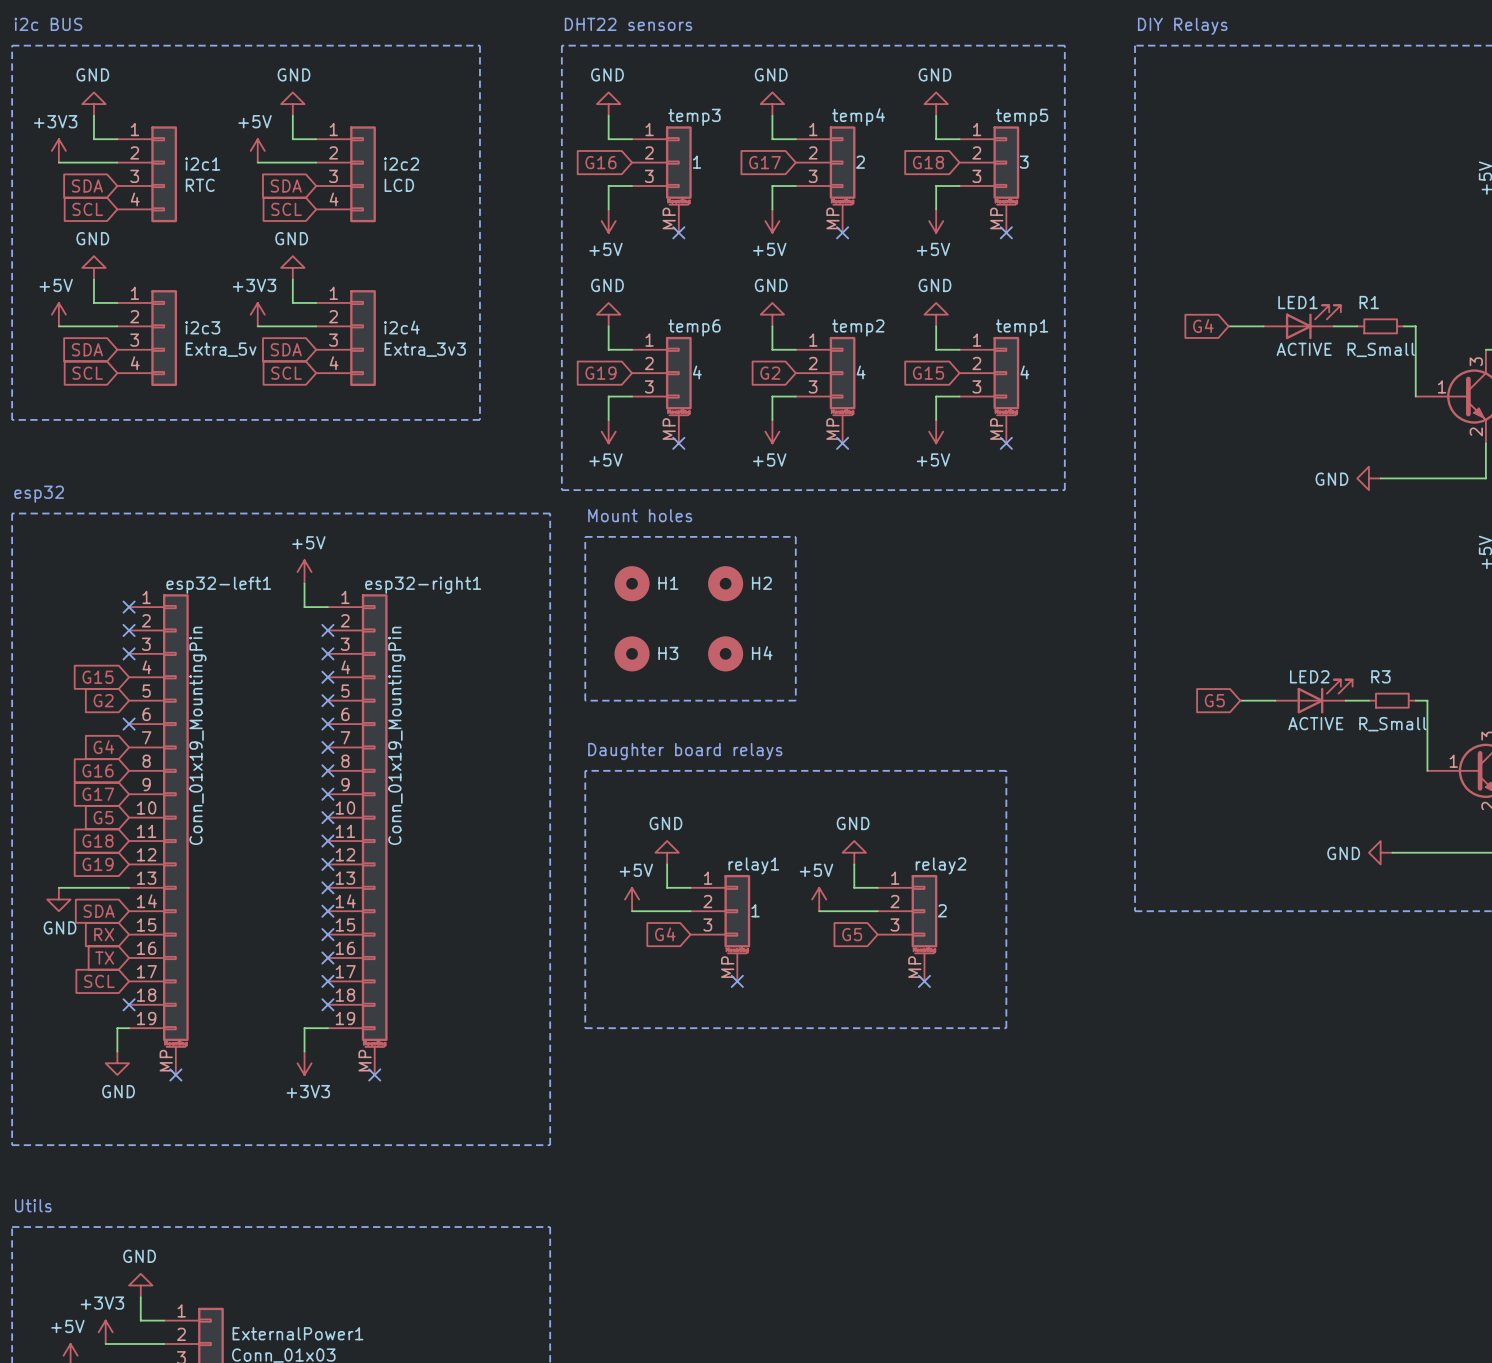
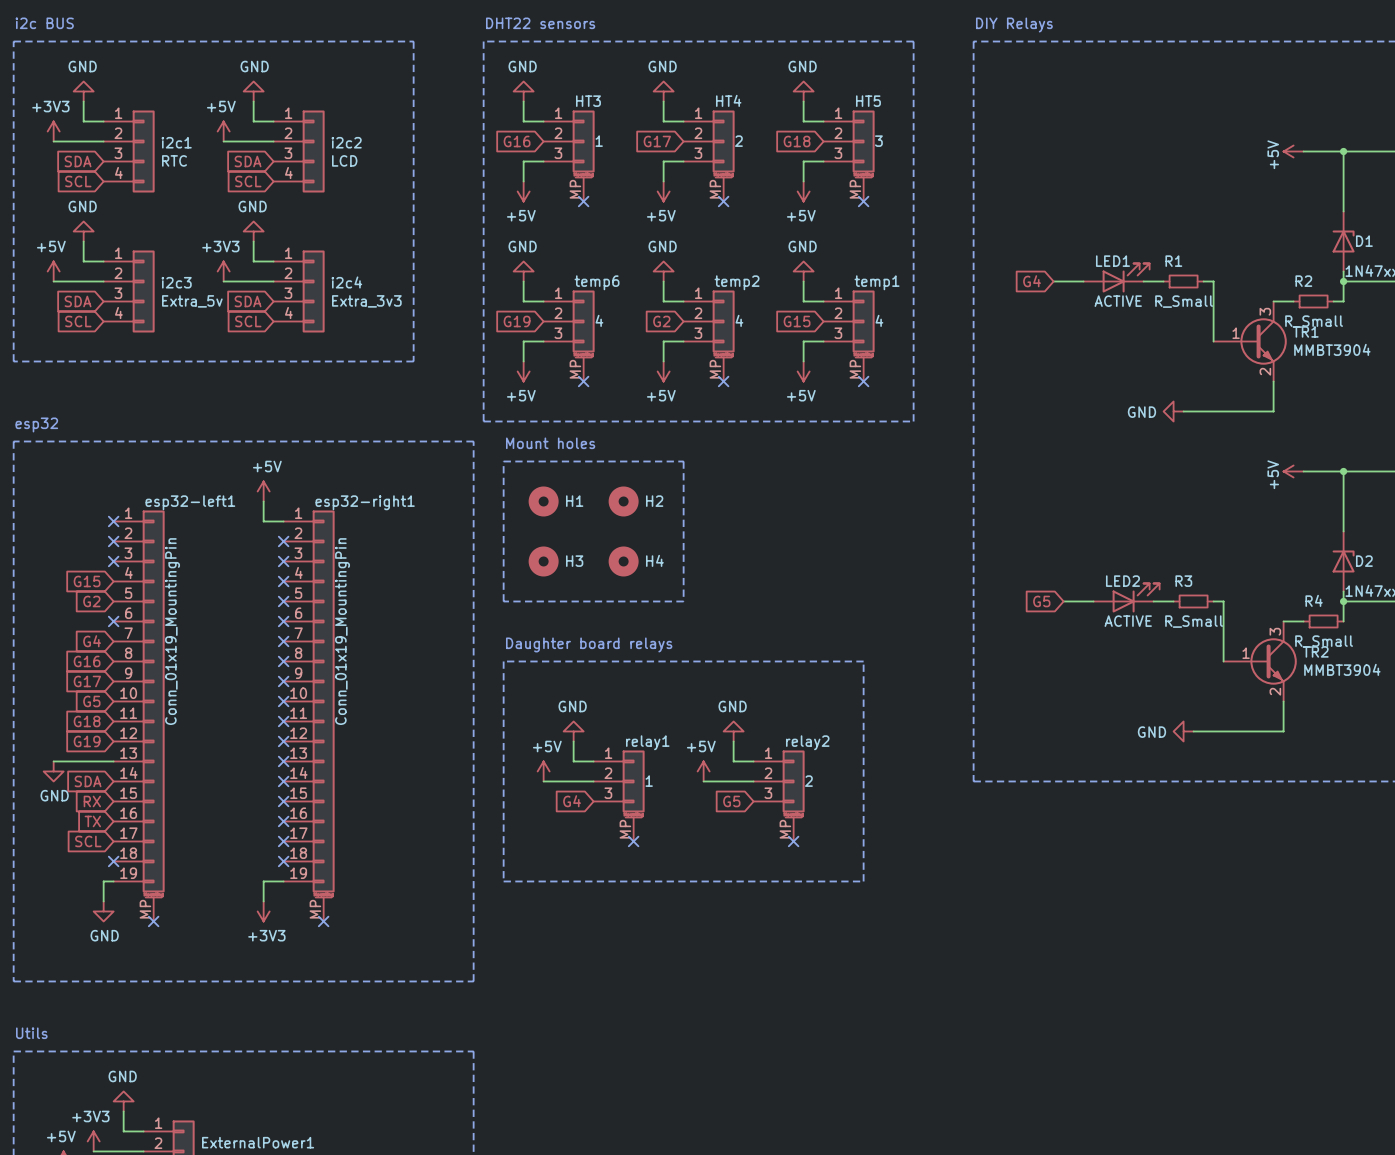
temp3 name: temp3 (694, 117) -> HT3 (588, 101)
temp4 name: temp4 (858, 117) -> HT4 (728, 100)
temp5 name: temp5 (1022, 117) -> HT5 (868, 101)

